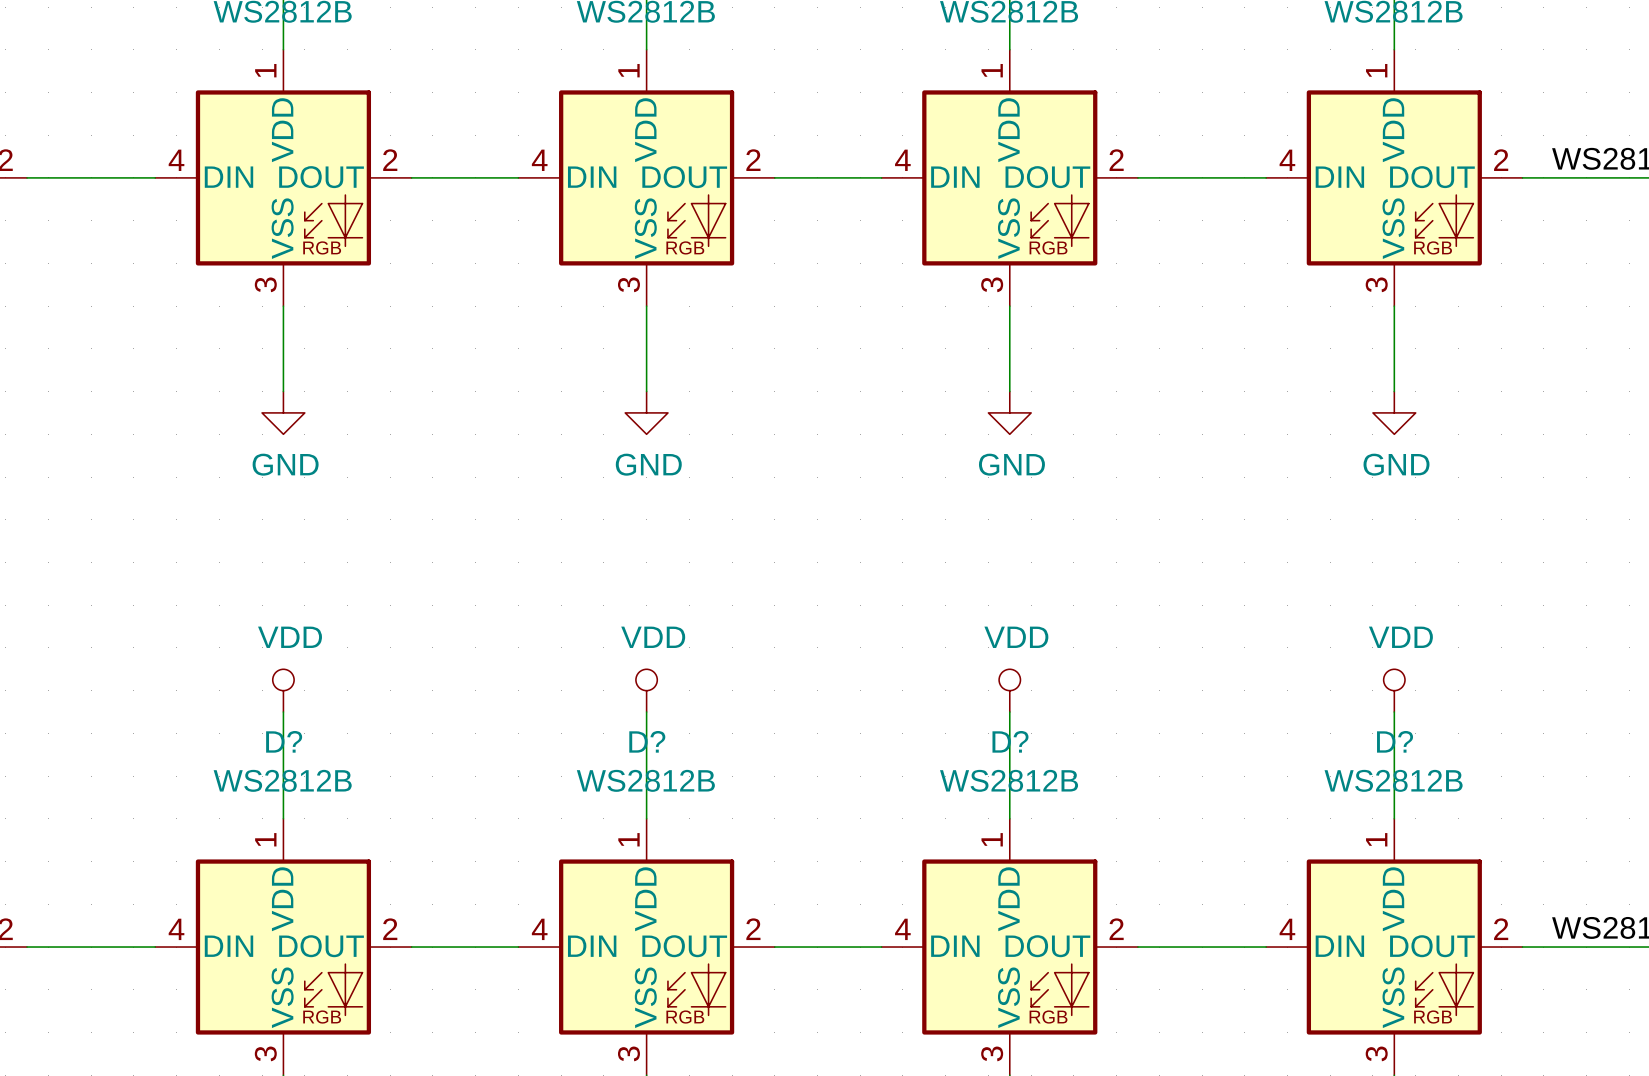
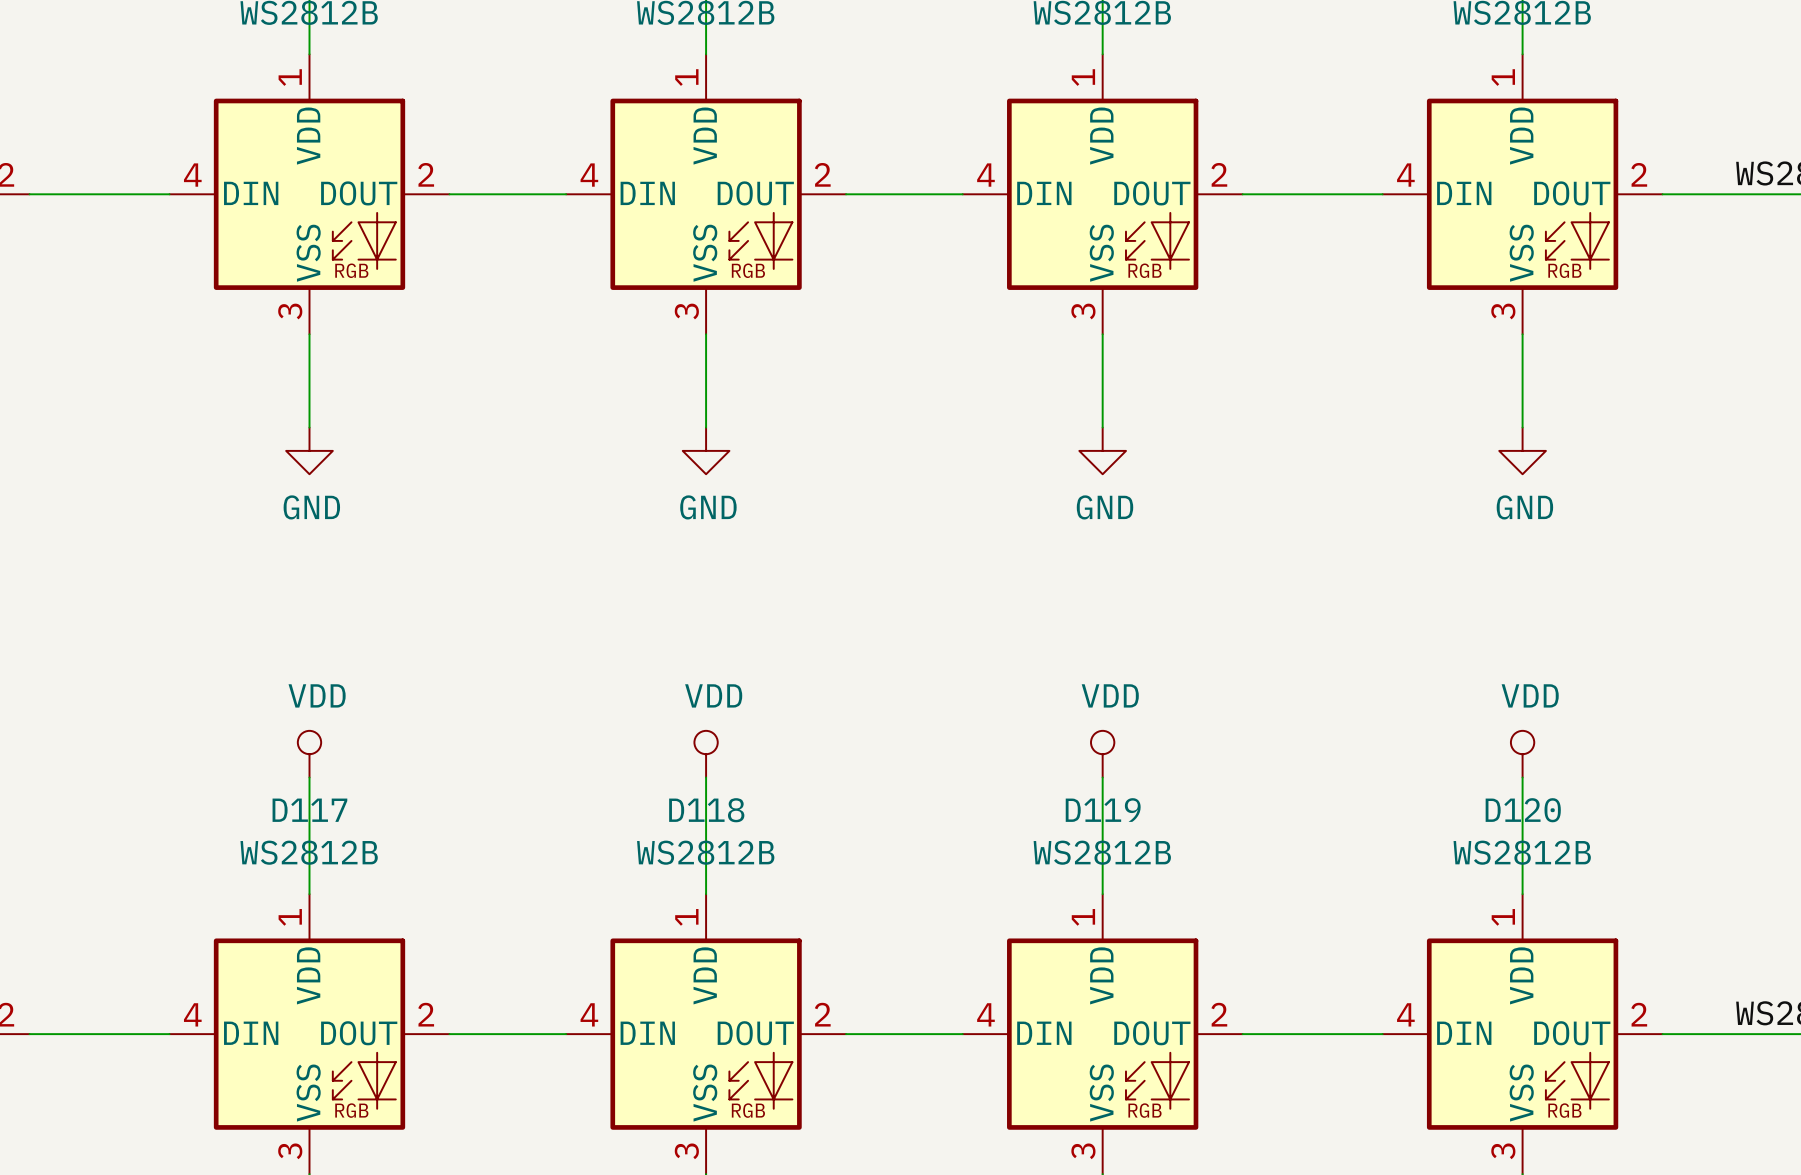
D? name: D? (284, 741) -> D117 (309, 810)
D? name: D? (647, 741) -> D118 (706, 810)
D? name: D? (1010, 741) -> D119 (1103, 810)
D? name: D? (1395, 741) -> D120 (1523, 810)

